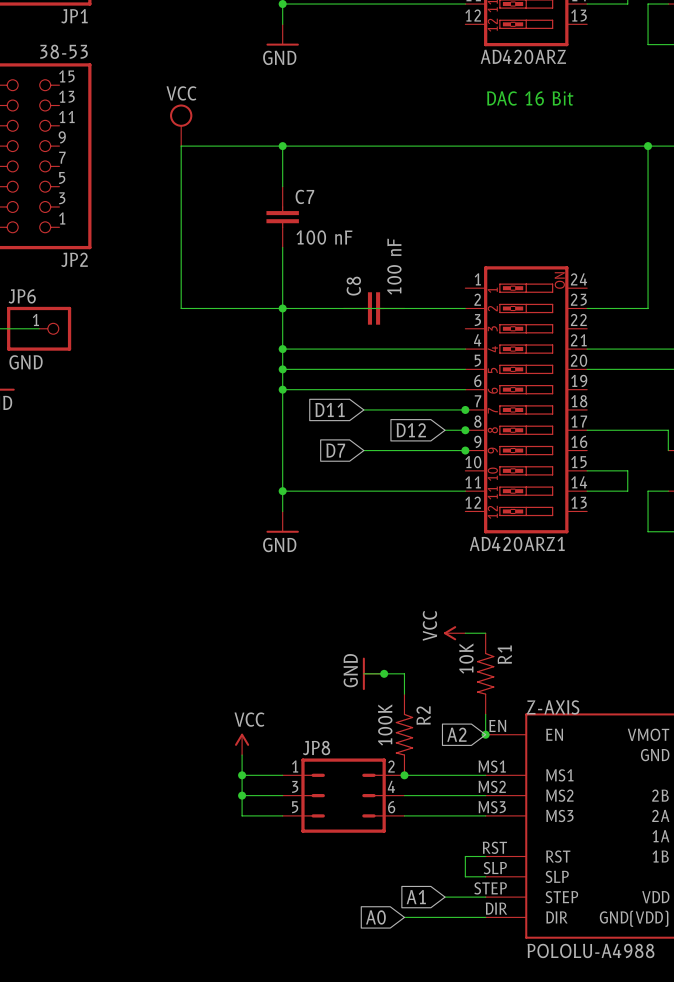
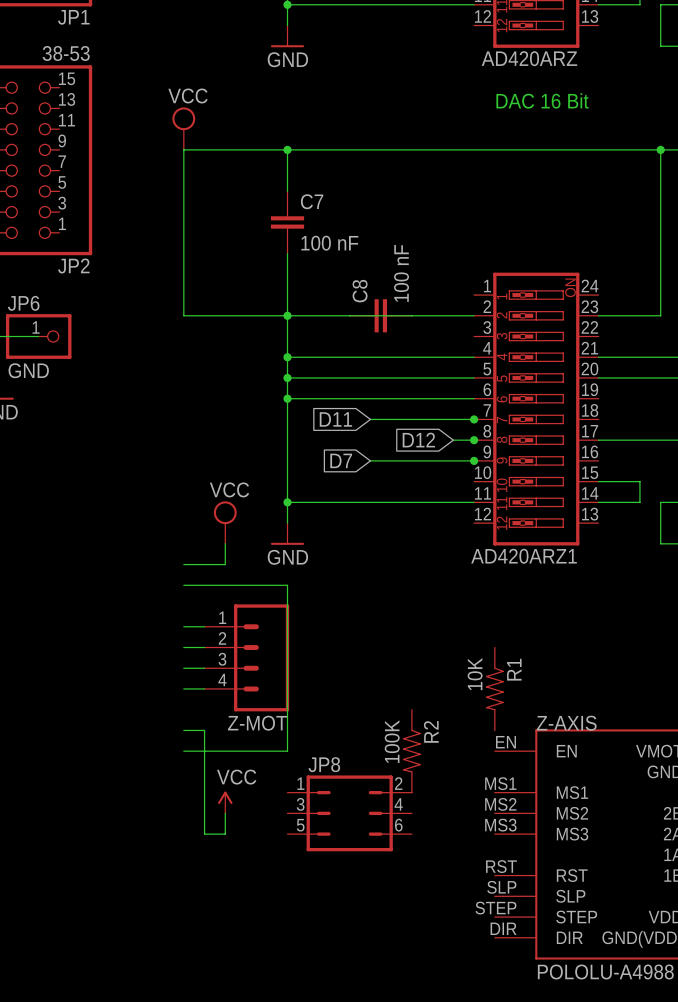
power symbol: none -> VCC (225, 522)
wire: none -> (225, 543) (225, 564) (183, 564)
wire: none -> (183, 585) (287, 585) (287, 751) (183, 751)
wire: none -> (183, 626) (204, 626)
wire: none -> (183, 647) (204, 647)
power symbol: VCC (454, 633) -> none
wire: (465, 633) (485, 633) -> none
Z-MOT: none -> (246, 657)
wire: none -> (183, 668) (204, 668)
wire: none -> (183, 688) (204, 688)
wire: (363, 673) (404, 673) (404, 694) -> none
power symbol: GND (373, 673) -> none
junction: (384, 673) -> none
wire: none -> (183, 730) (204, 730) (204, 834) (225, 834) (225, 813)
wire: (485, 714) (485, 734) -> none
global label: A2 (456, 734) -> none
junction: (485, 734) -> none
power symbol position: VCC (242, 744) -> VCC (225, 802)
wire: (242, 755) (242, 815) (282, 815) -> none
wire: (242, 775) (282, 775) -> none
junction: (242, 775) -> none
wire: (404, 775) (485, 775) -> none
junction: (404, 775) -> none
wire: (242, 795) (282, 795) -> none
junction: (242, 795) -> none
wire: (404, 795) (485, 795) -> none
wire: (404, 815) (485, 815) -> none
wire: (485, 856) (465, 856) (465, 876) (485, 876) -> none
global label: A1 (416, 897) -> none
wire: (445, 897) (485, 897) -> none
global label: A0 (375, 917) -> none
wire: (404, 917) (485, 917) -> none

